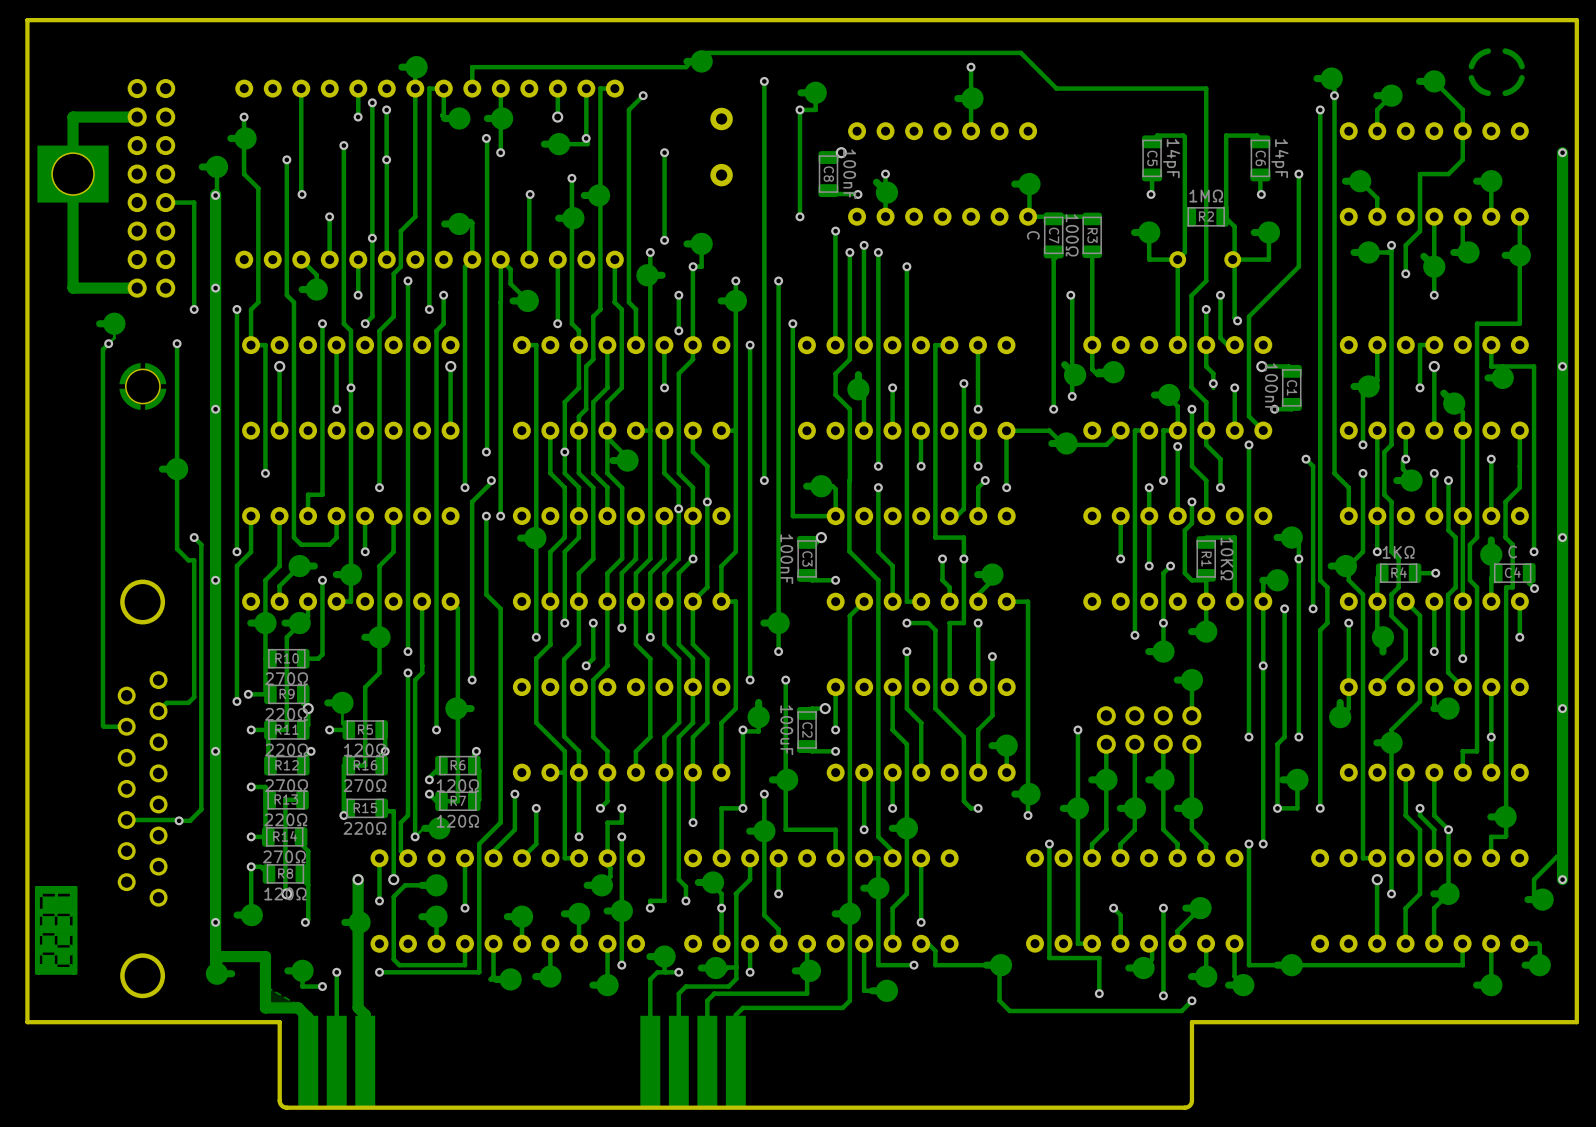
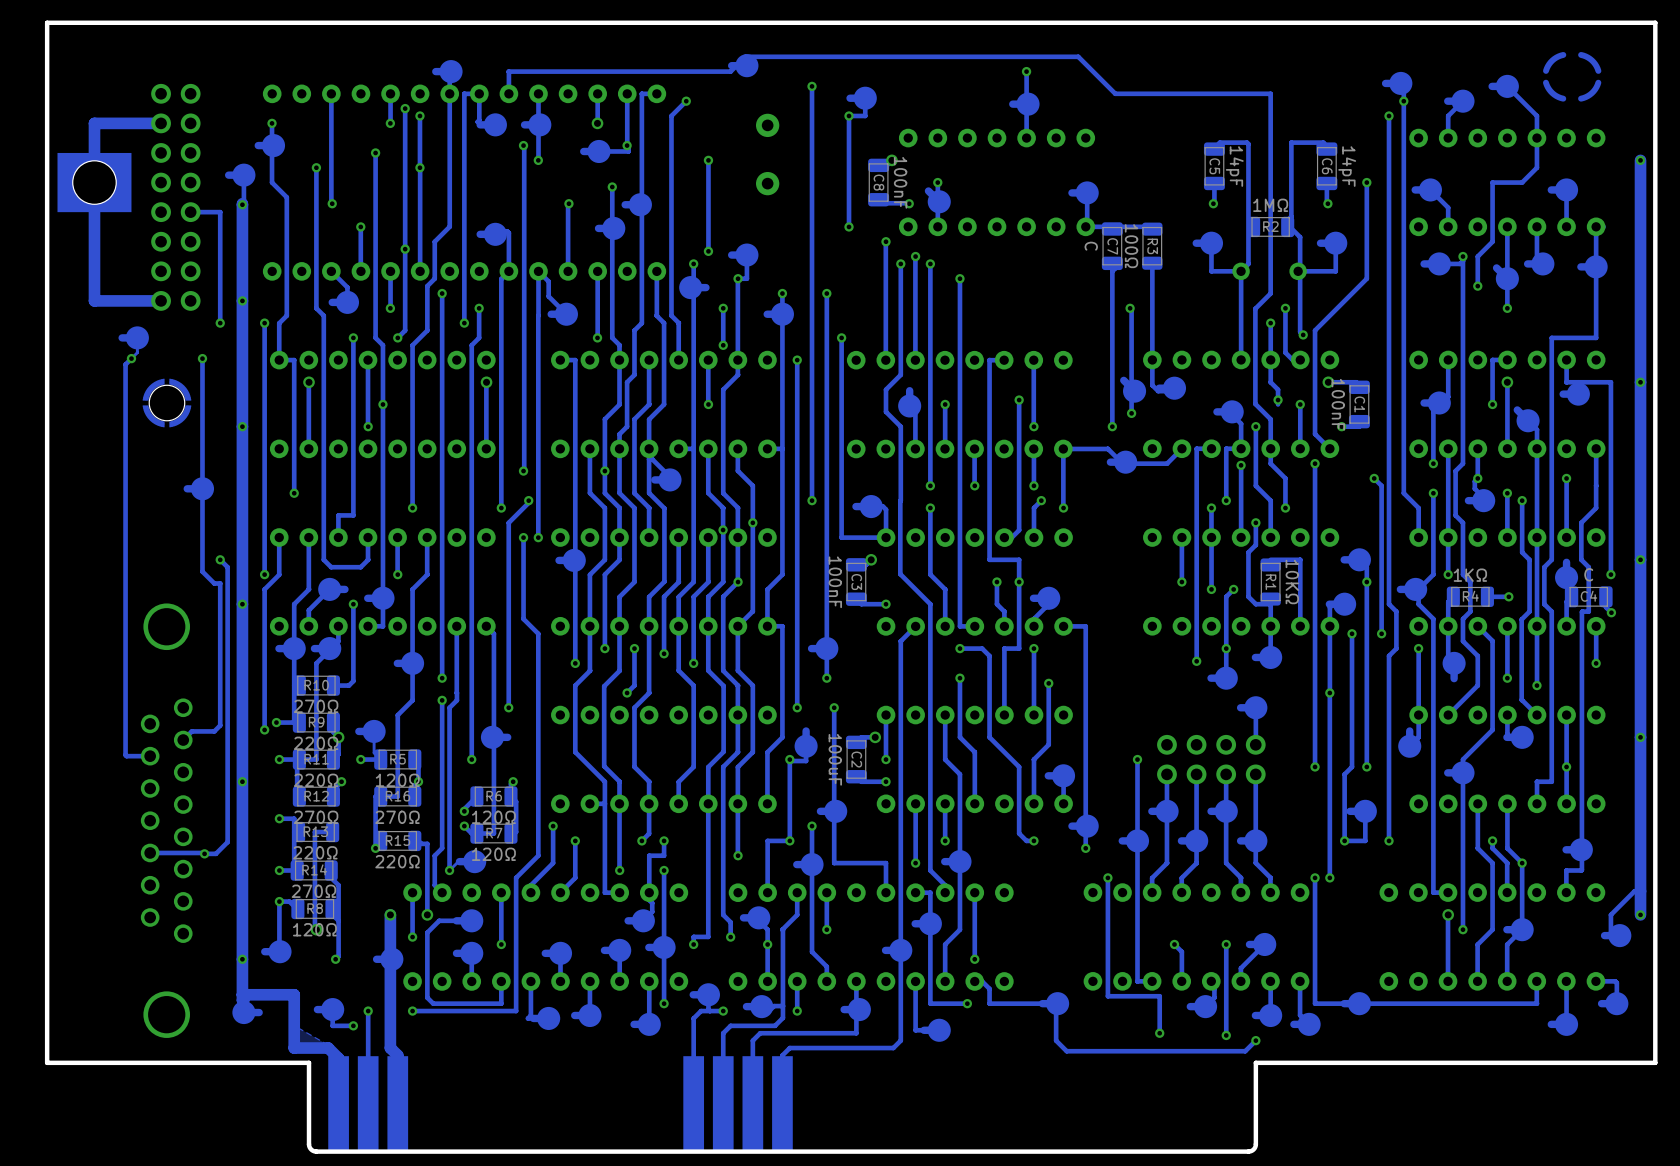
drawing: [34, 885, 78, 975] -> none

